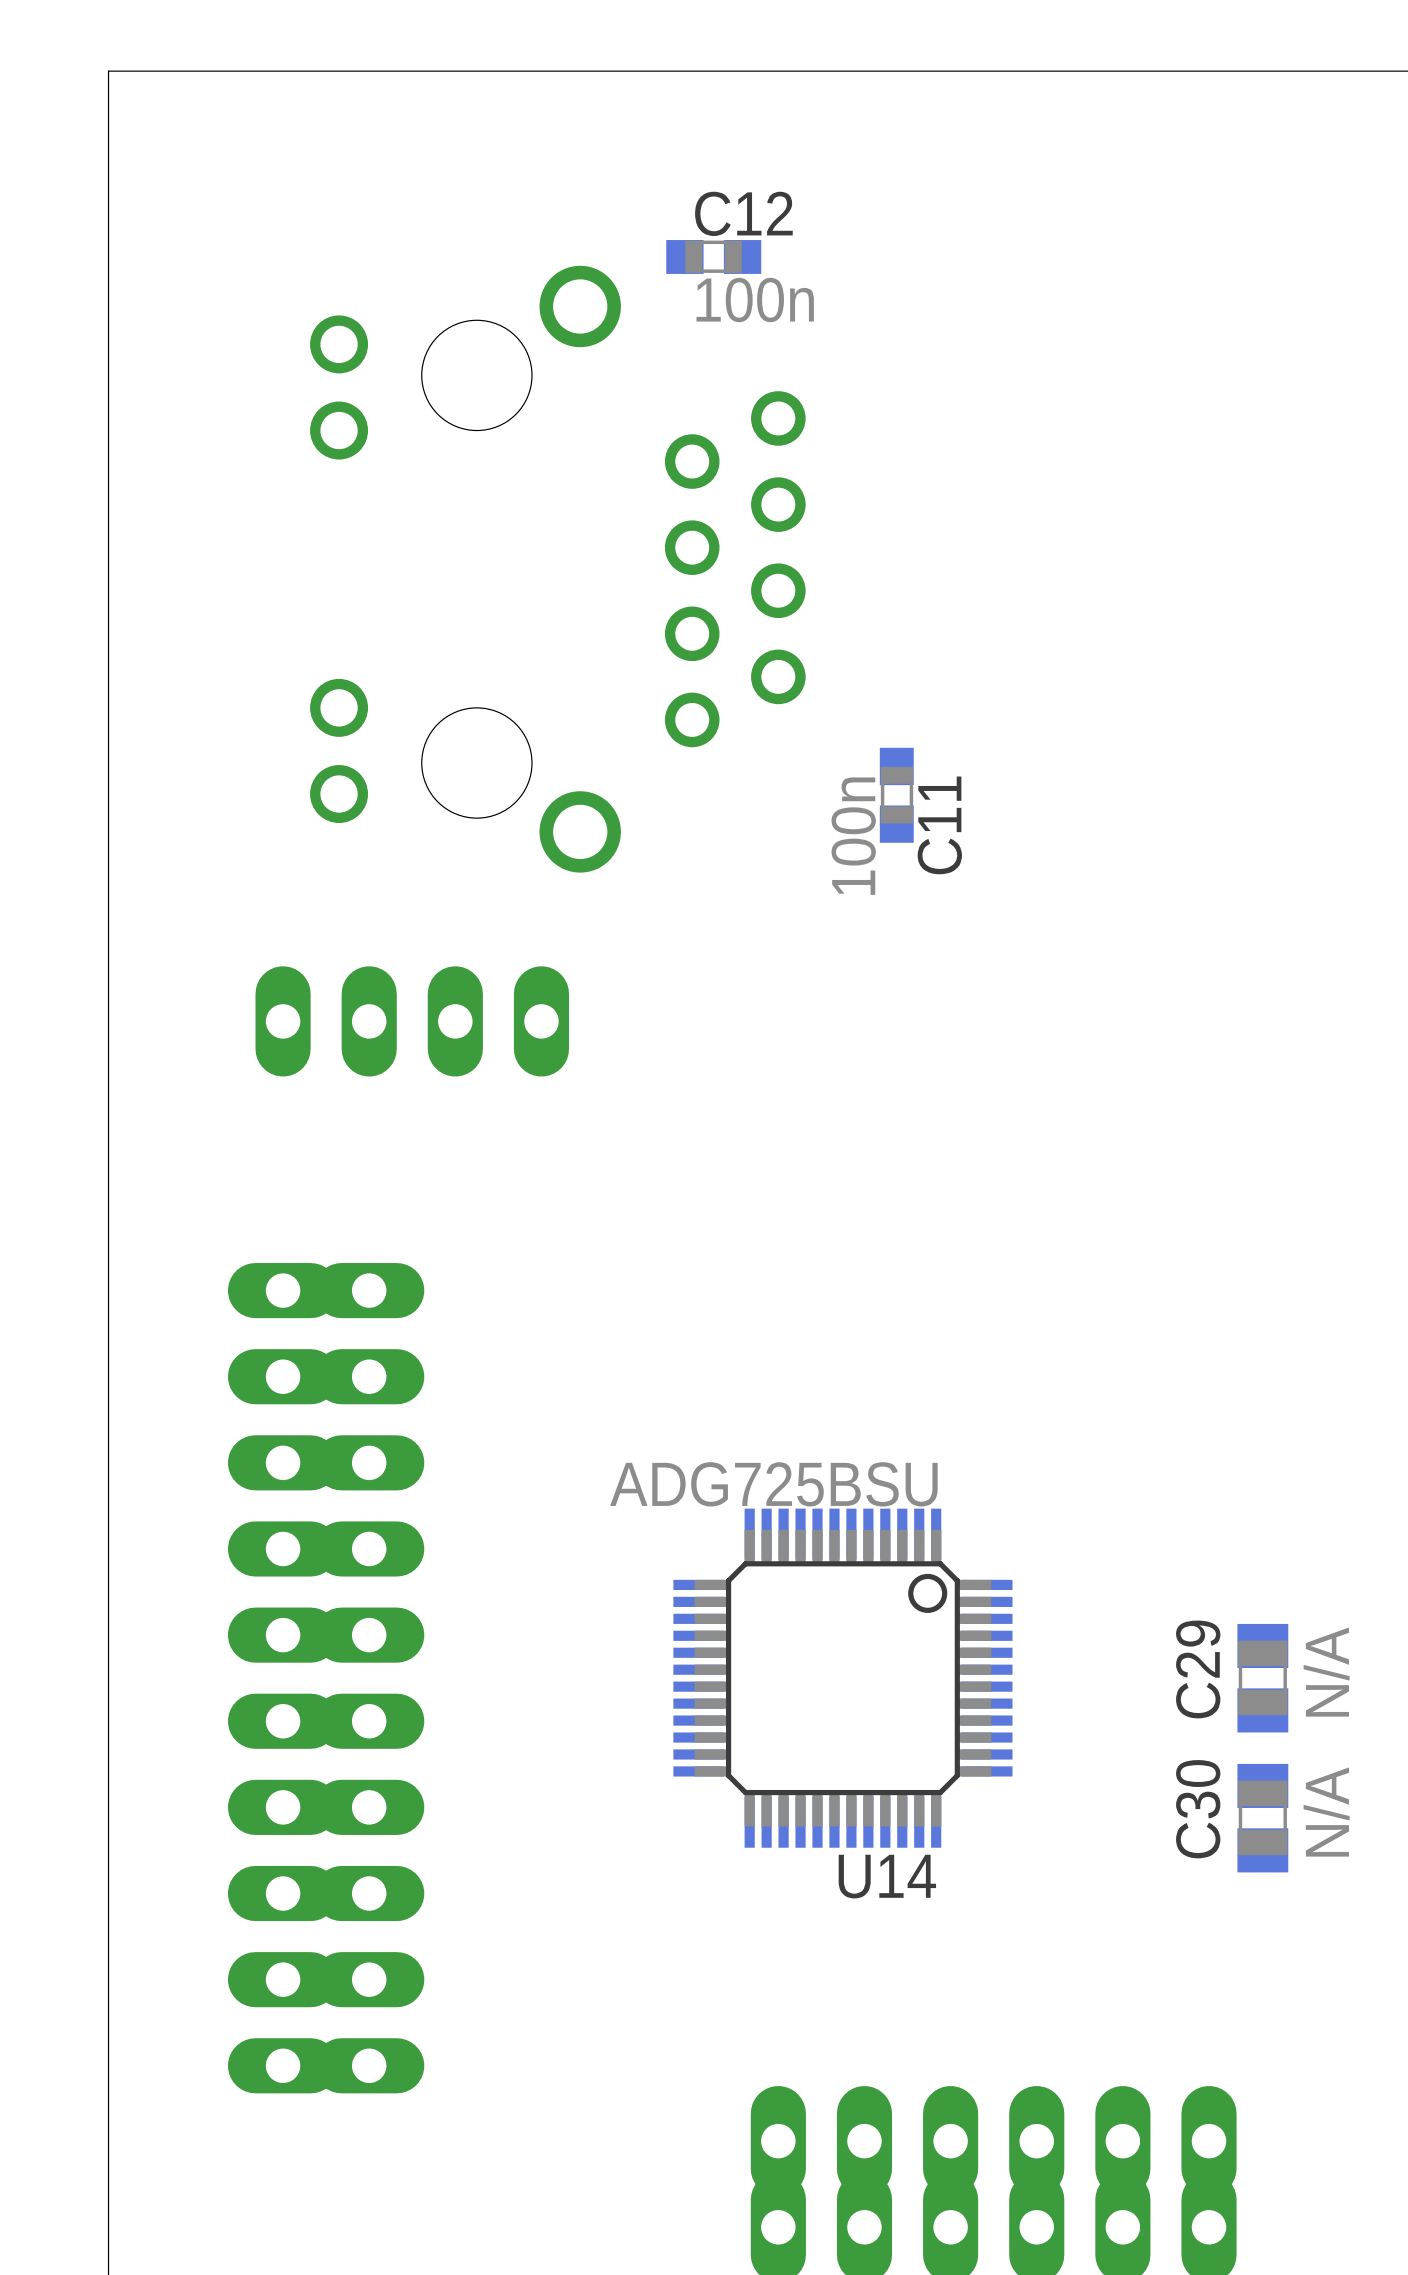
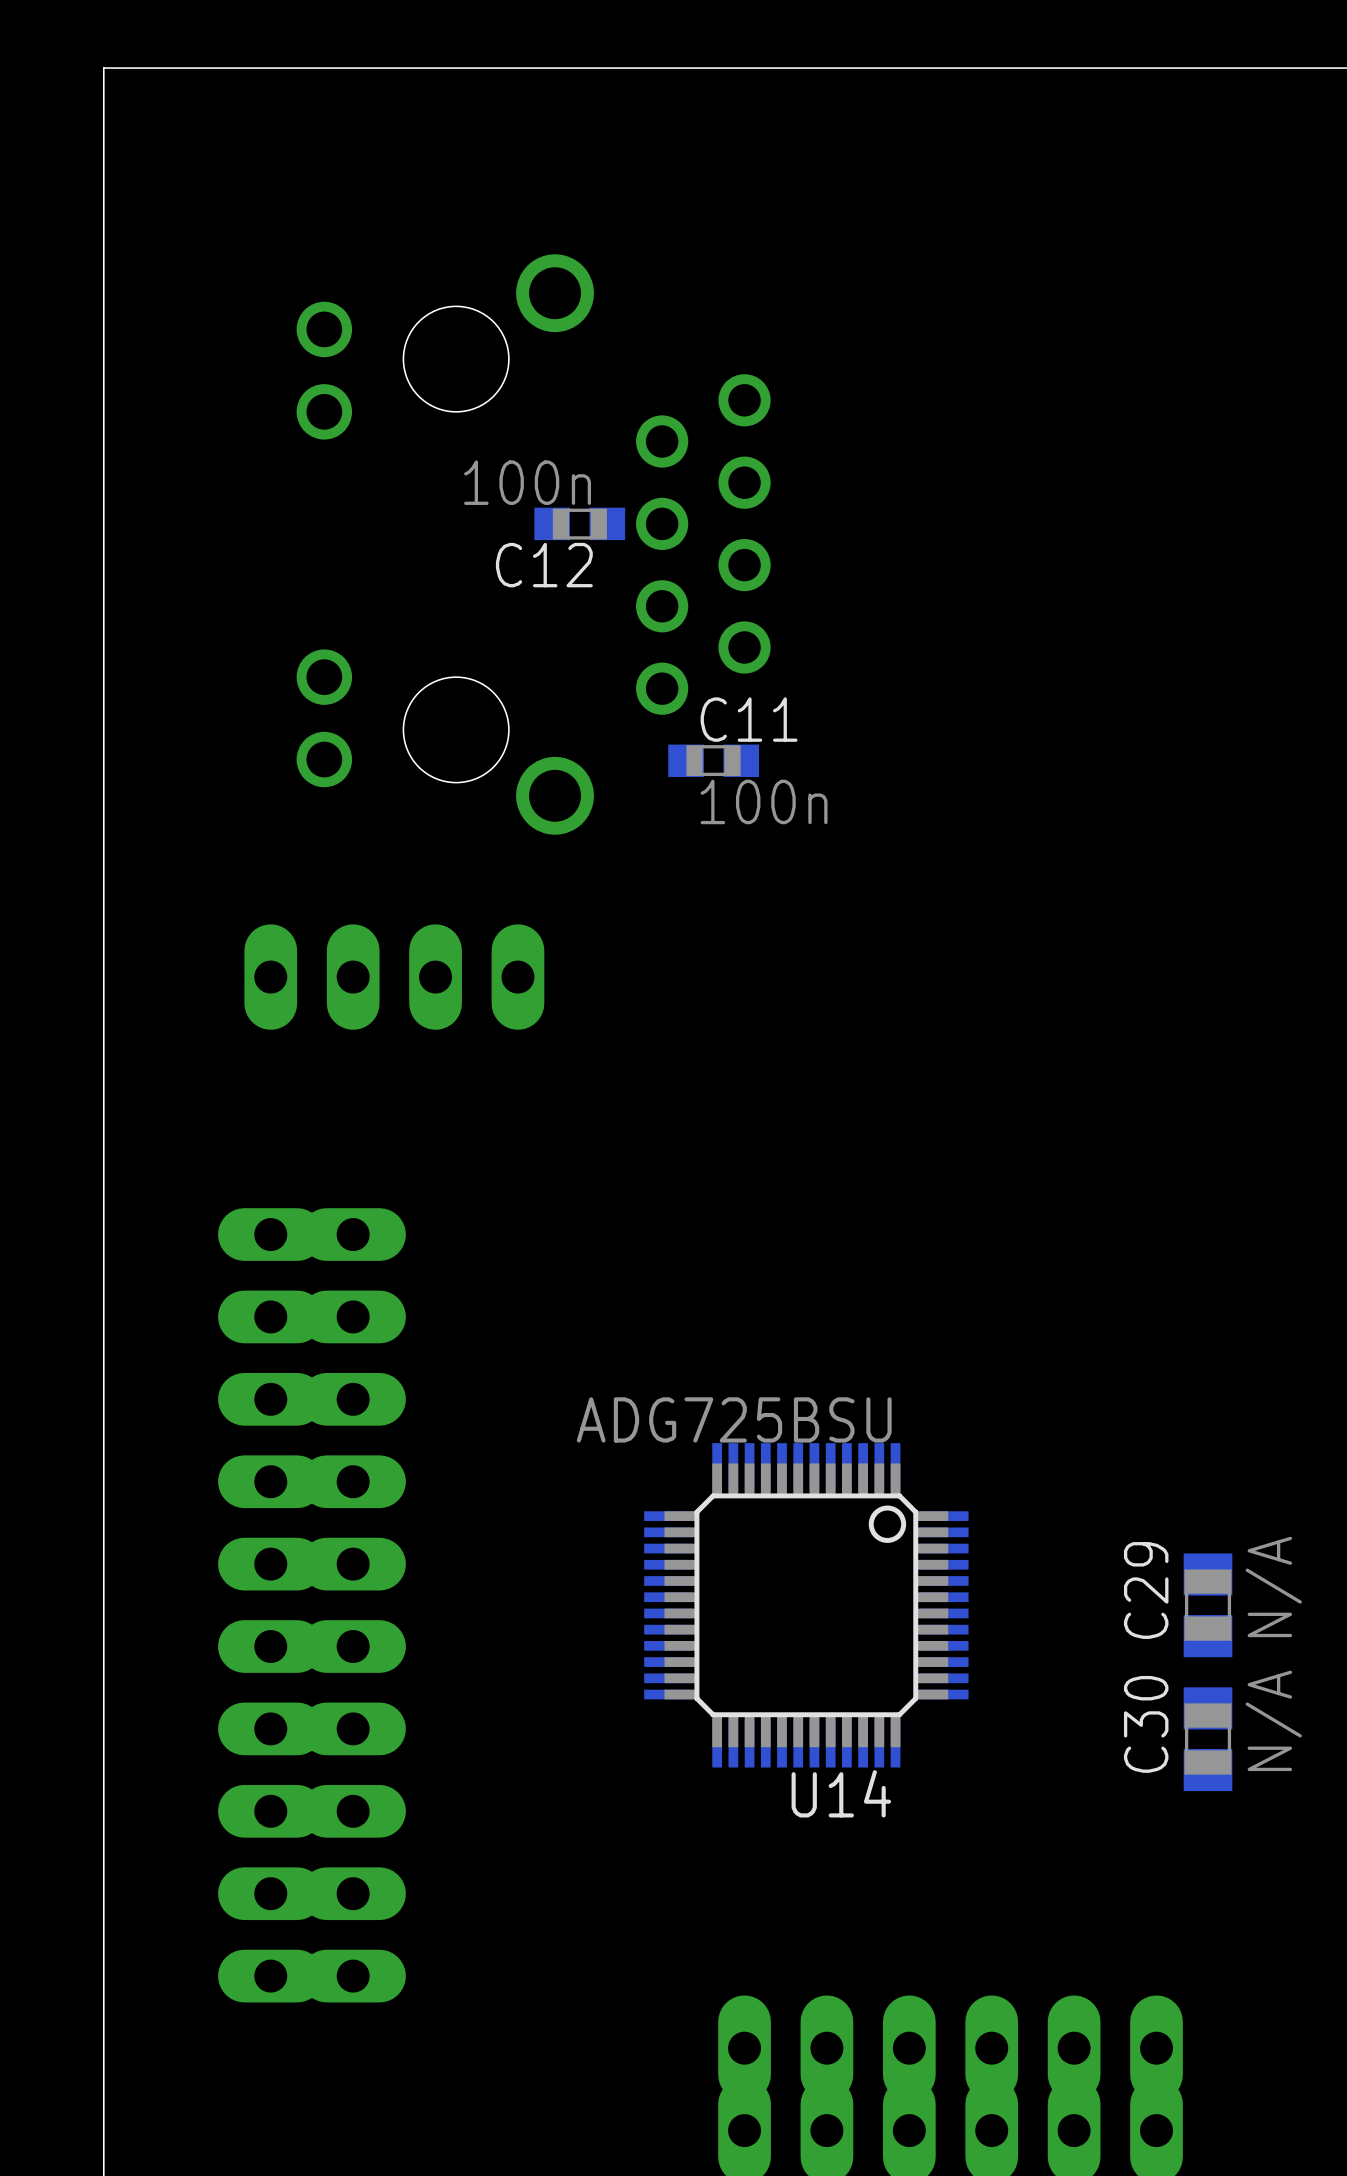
C12 name position: C12 (743, 213) -> C12 (544, 565)
C12 position: (713, 256) -> (579, 523)
C12 value position: 100n (755, 300) -> 100n (527, 482)
C11 rotation: 0° (896, 795) -> 90° clockwise (713, 760)
C11 position: (896, 795) -> (713, 760)
C11 name position: C11 (939, 825) -> C11 (749, 719)
C11 value position: 100n (853, 836) -> 100n (764, 801)

